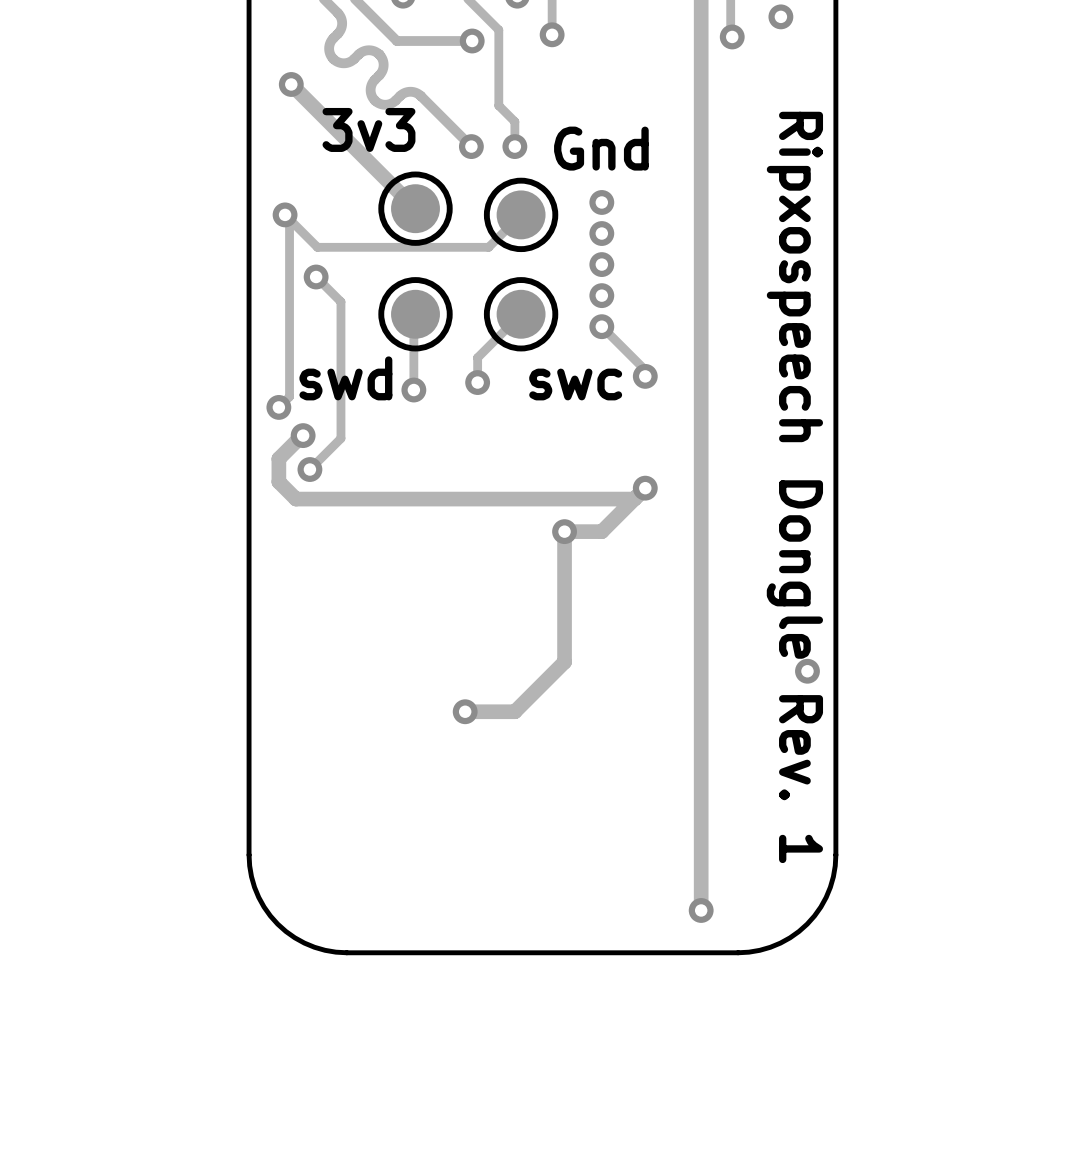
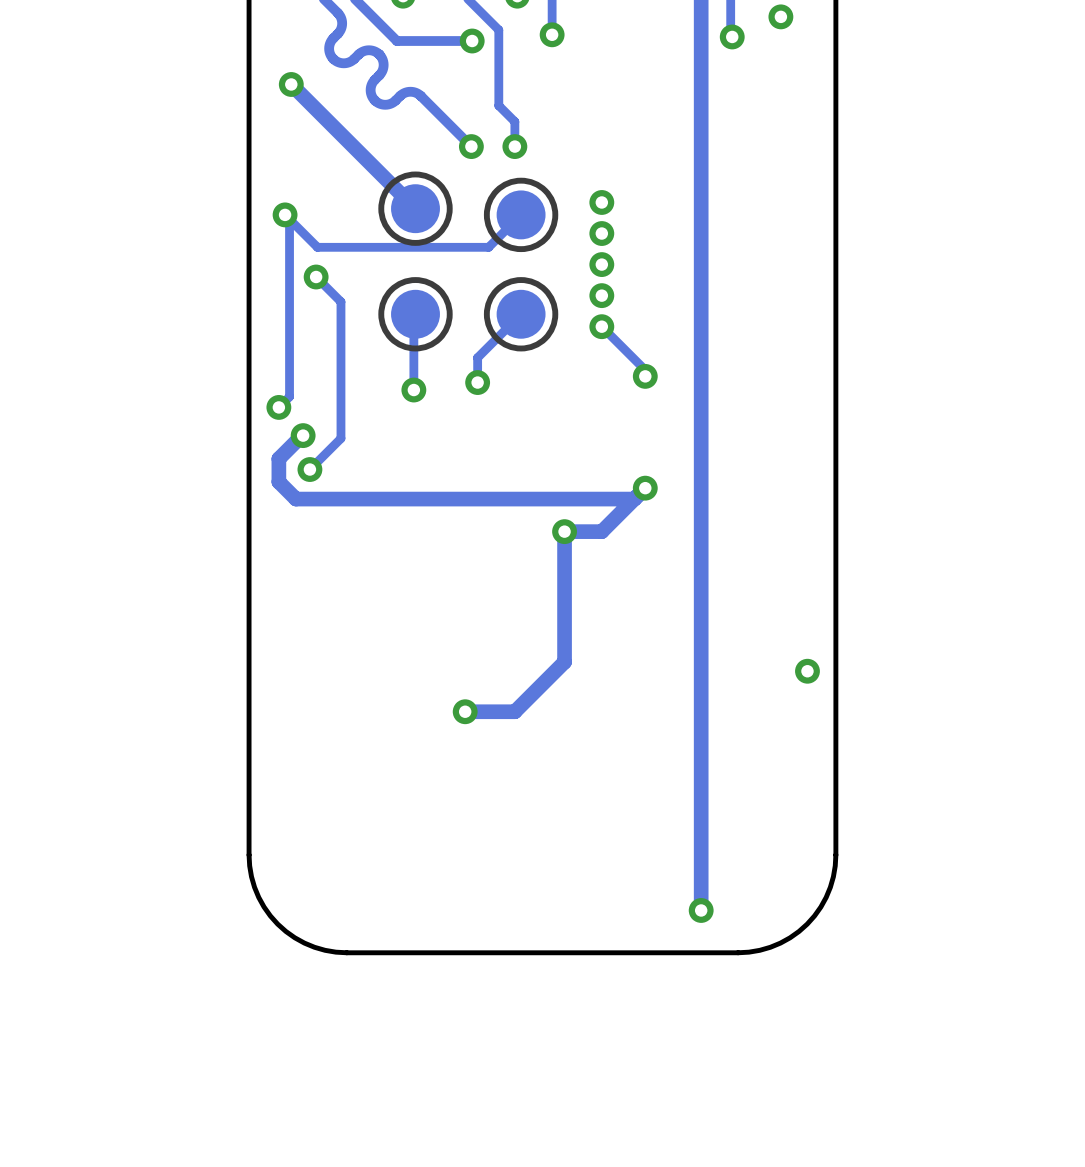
text: 3v3 (368, 129) -> none
text: Gnd (601, 148) -> none
text: swd (345, 378) -> none
text: swc (575, 384) -> none
text: Ripxospeech Dongle Rev. 1 (794, 487) -> none

